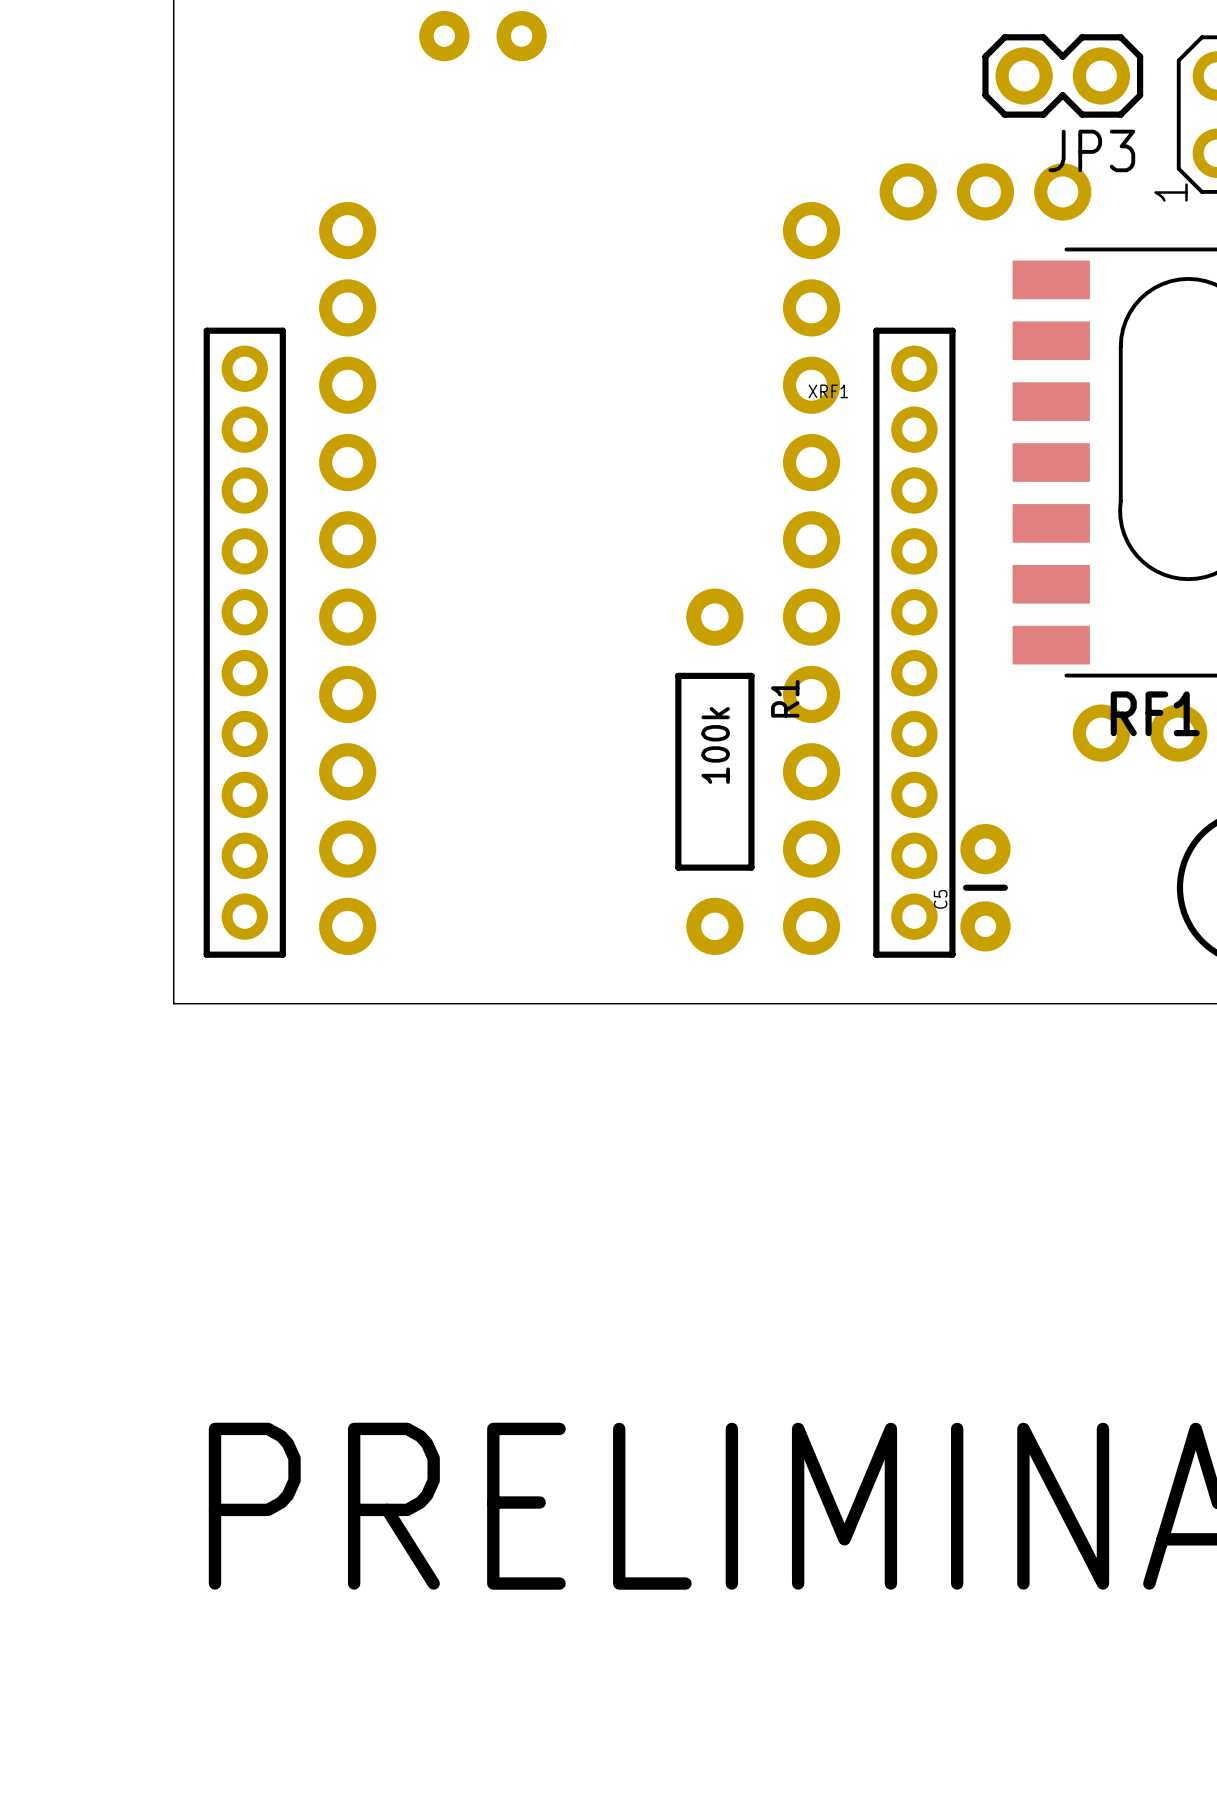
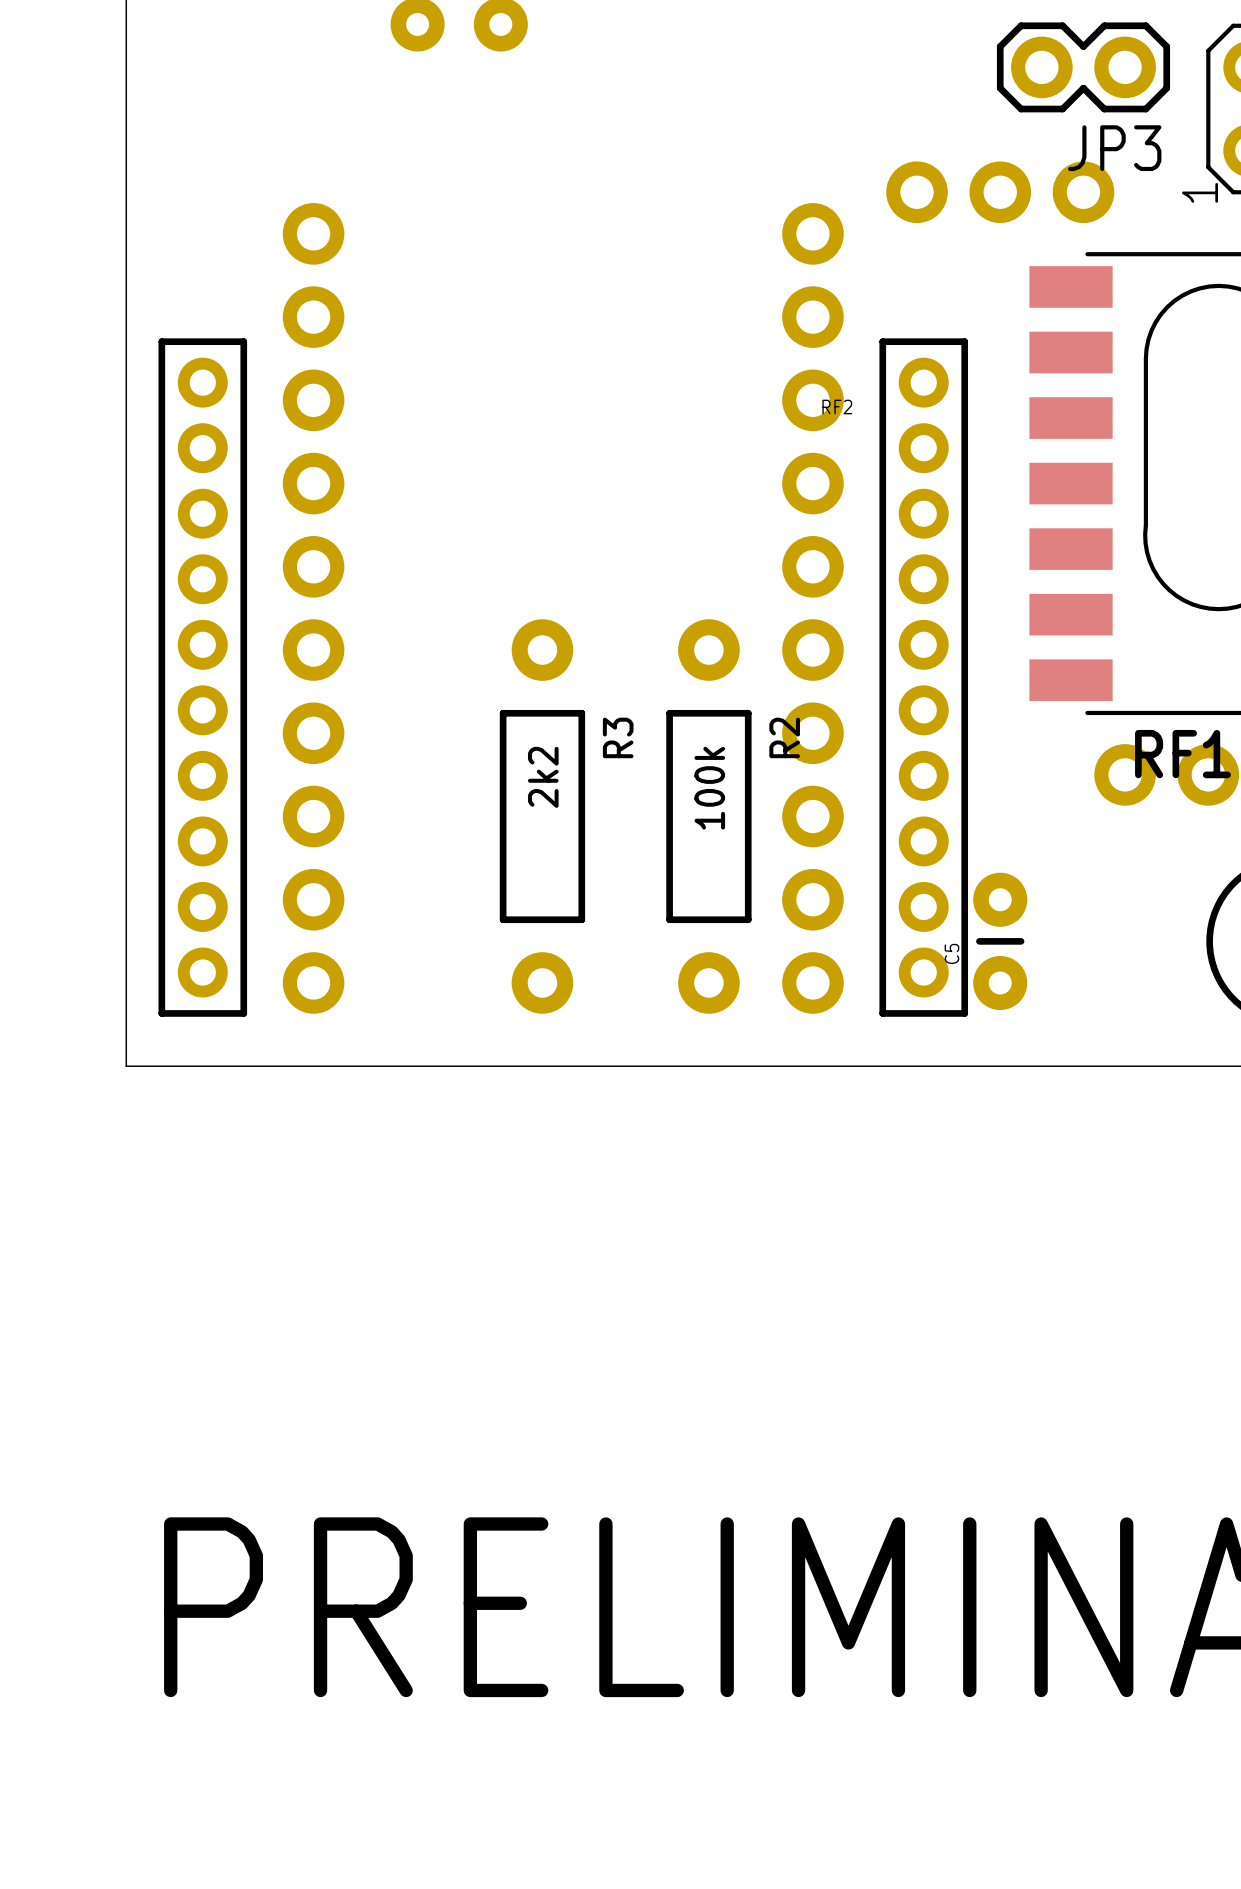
XRF1 name: XRF1 (828, 391) -> RF2 (837, 407)
R1 name: R1 (785, 698) -> R2 (784, 737)
R3: none -> 2k2 (542, 816)

